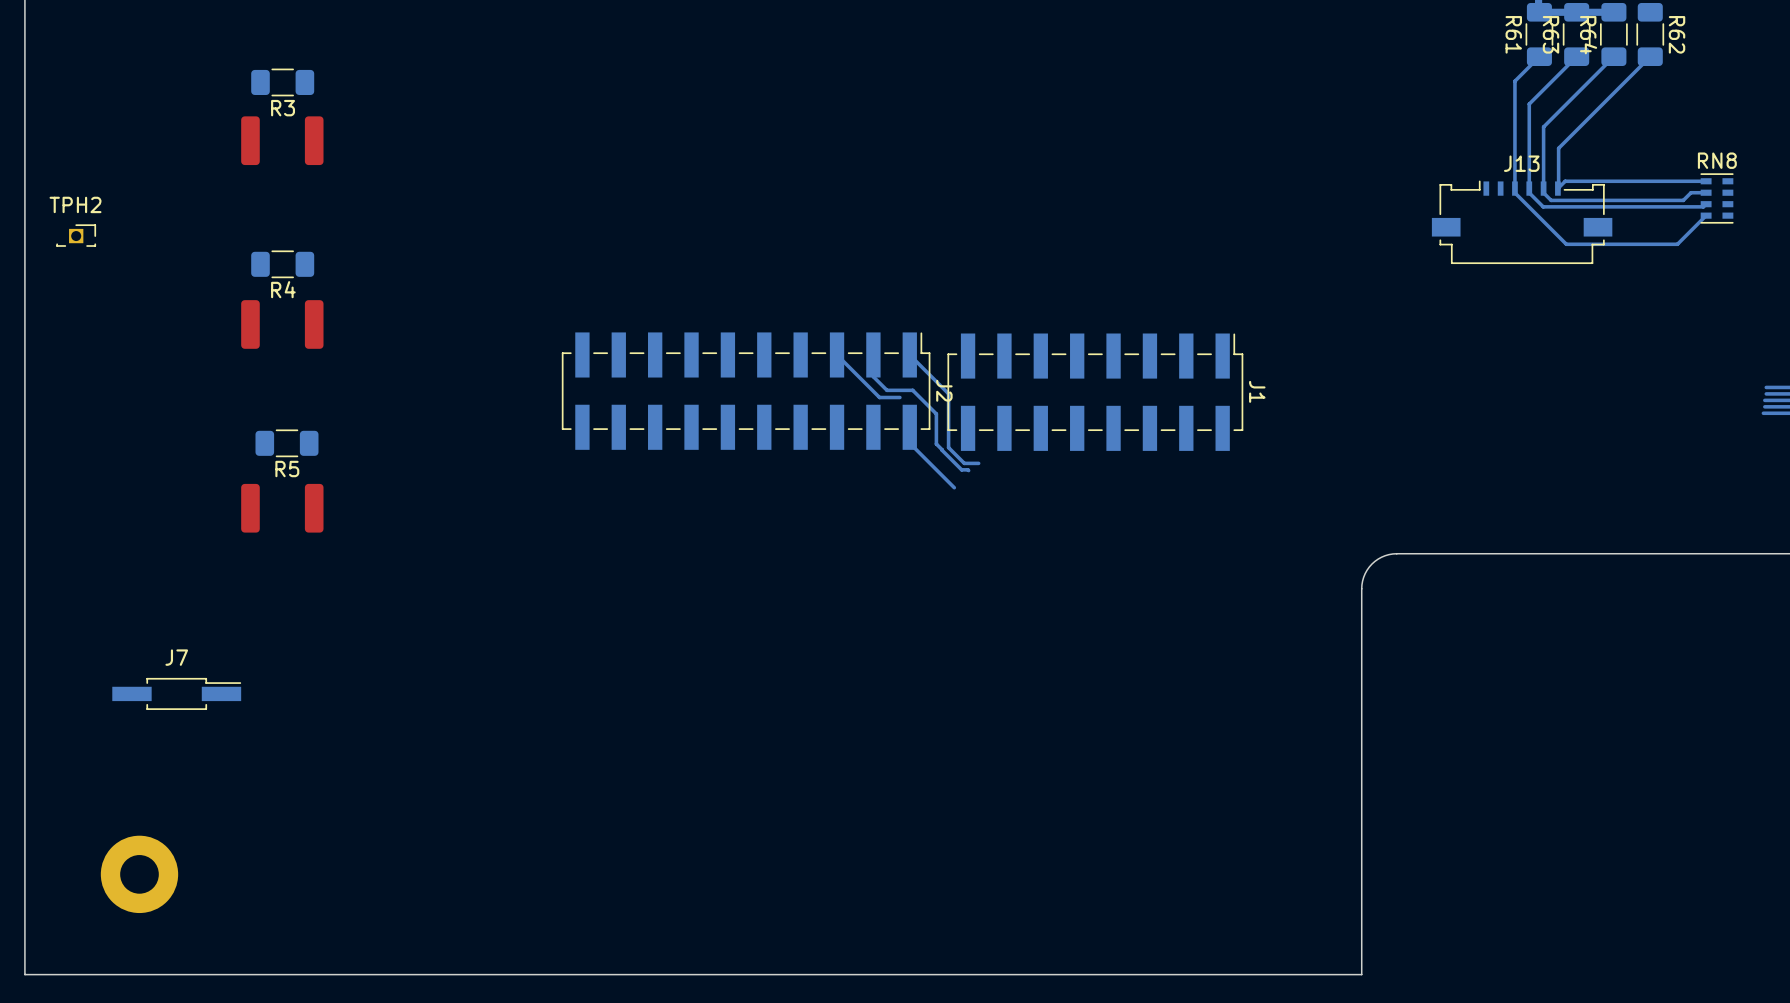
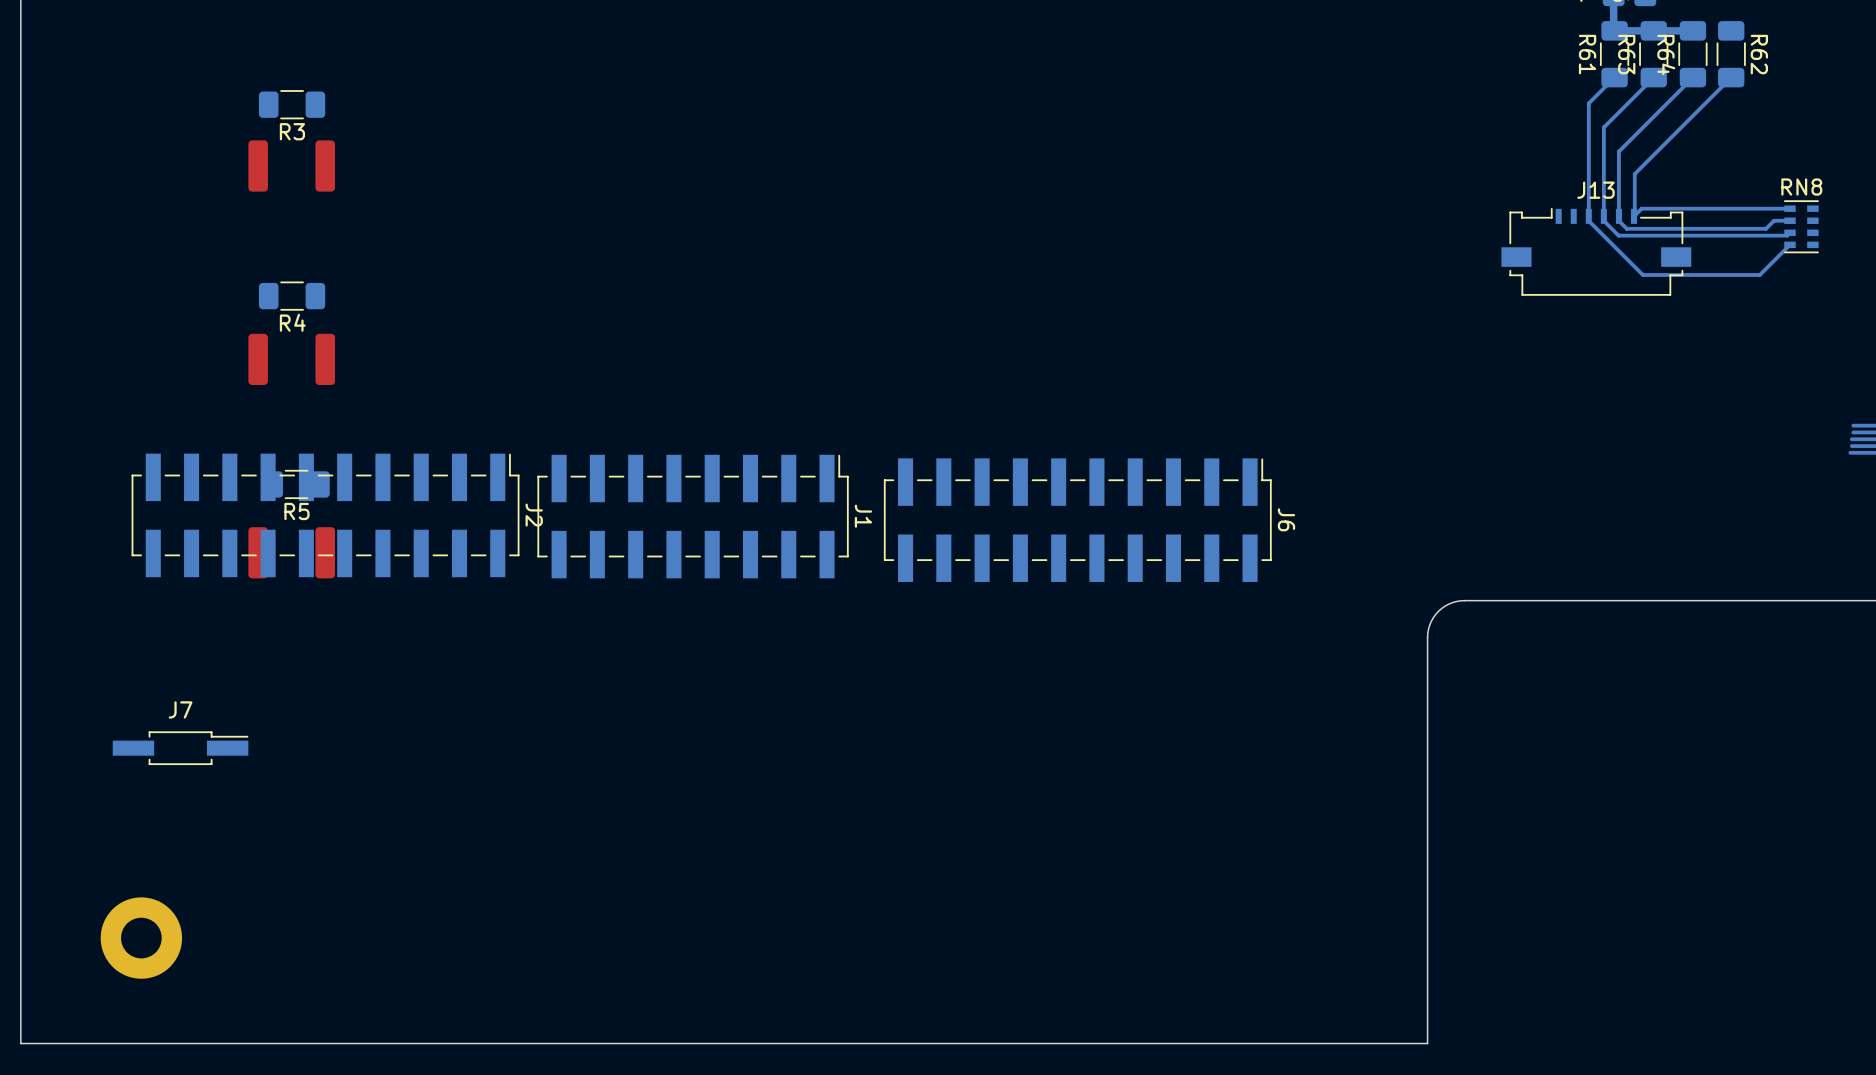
TPH2: (76, 235) -> none
bottom track: (837, 354) (879, 397) (899, 397) -> none
bottom track: (873, 354) (873, 376) (887, 390) (912, 390) (936, 413) (936, 444) (961, 469) (968, 470) -> none
bottom track: (909, 354) (948, 393) (948, 447) (964, 463) (978, 463) -> none
J2 position: (746, 391) -> (325, 515)
J1 position: (1095, 392) -> (693, 516)
bottom track: (909, 427) (909, 443) (954, 487) -> none
J6: none -> (1077, 520)

